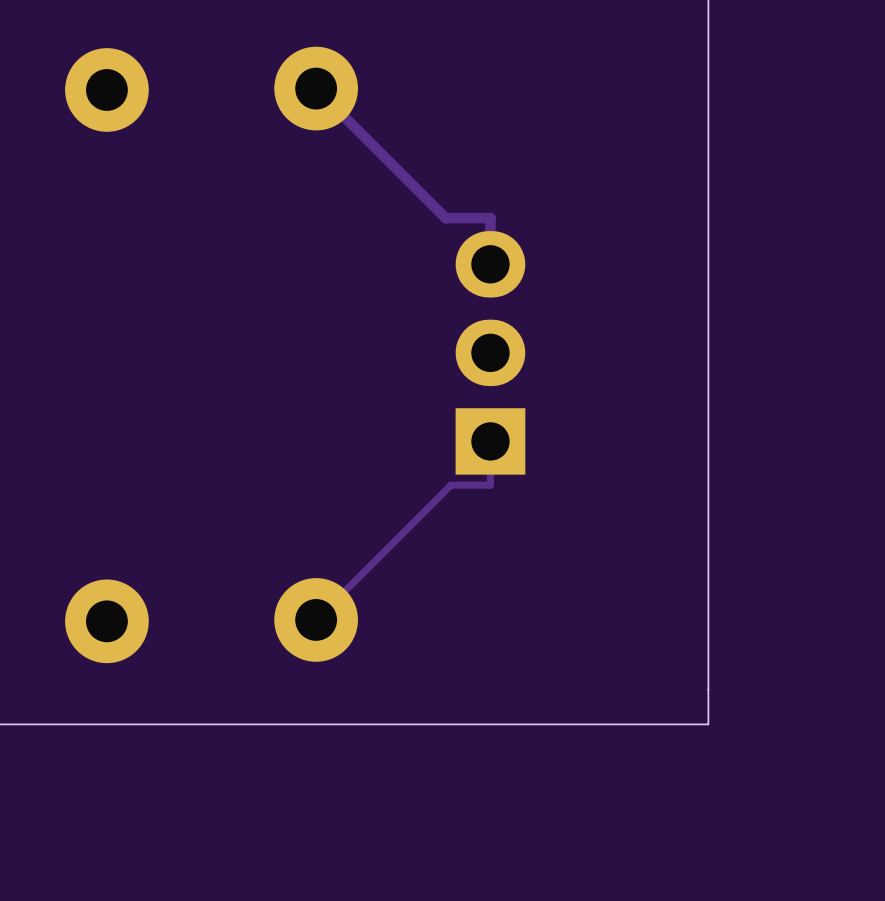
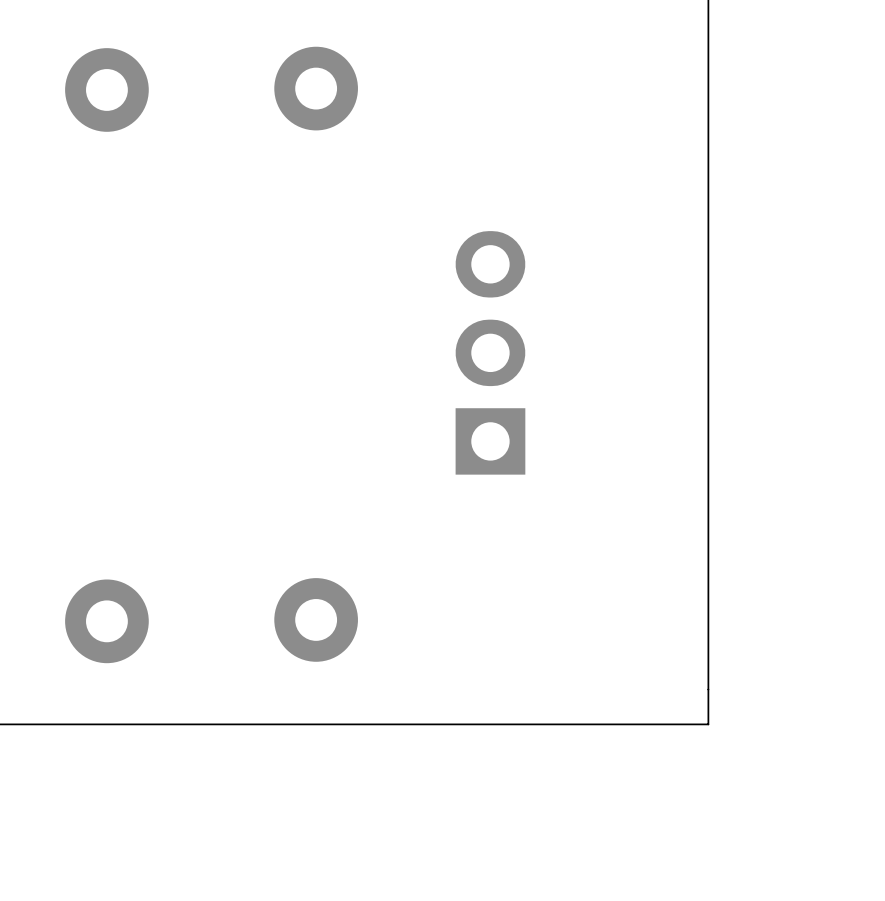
track: (316, 88) (445, 218) (490, 218) (490, 264) -> none
track: (490, 441) (490, 485) (450, 485) (316, 619) -> none

